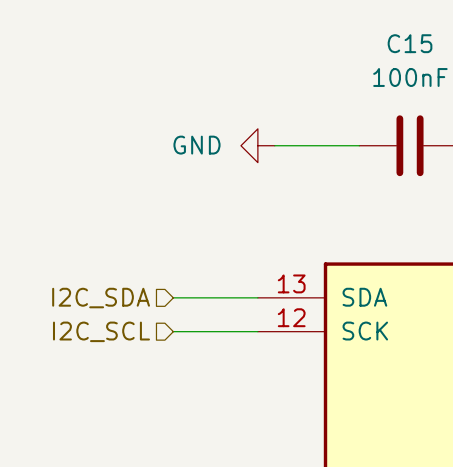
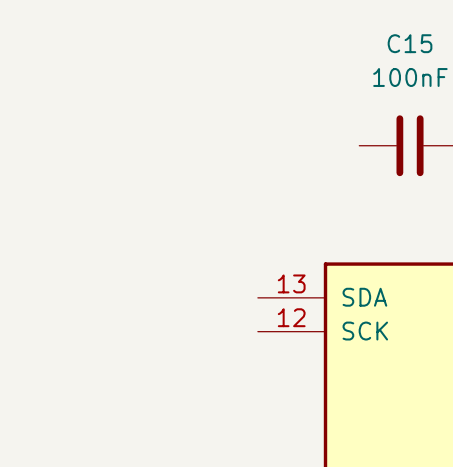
power symbol: GND (257, 145) -> none
wire: (274, 145) (359, 145) -> none
wire: (173, 297) (257, 297) -> none
hierarchical label: I2C_SDA (101, 298) -> none
hierarchical label: I2C_SCL (101, 331) -> none
wire: (173, 331) (257, 331) -> none

